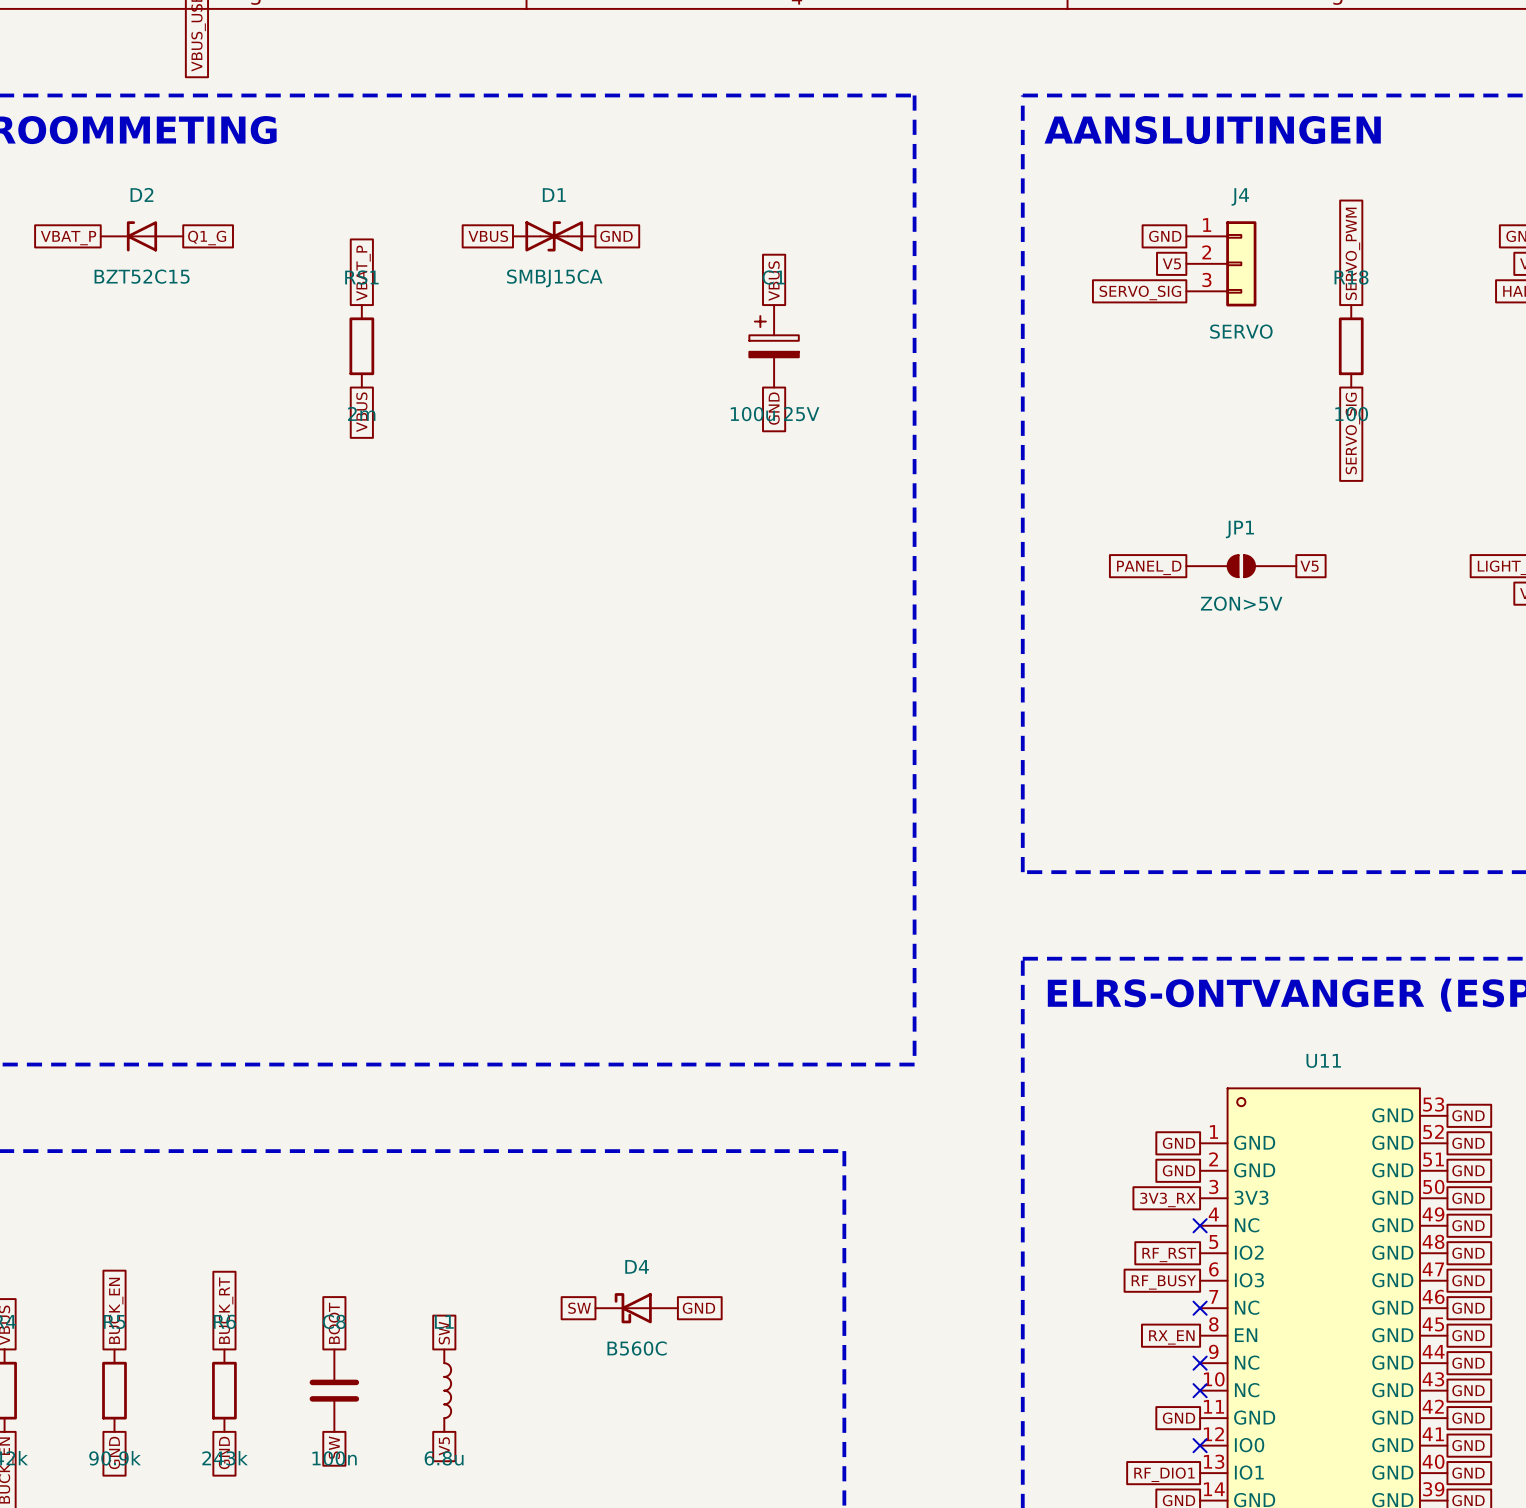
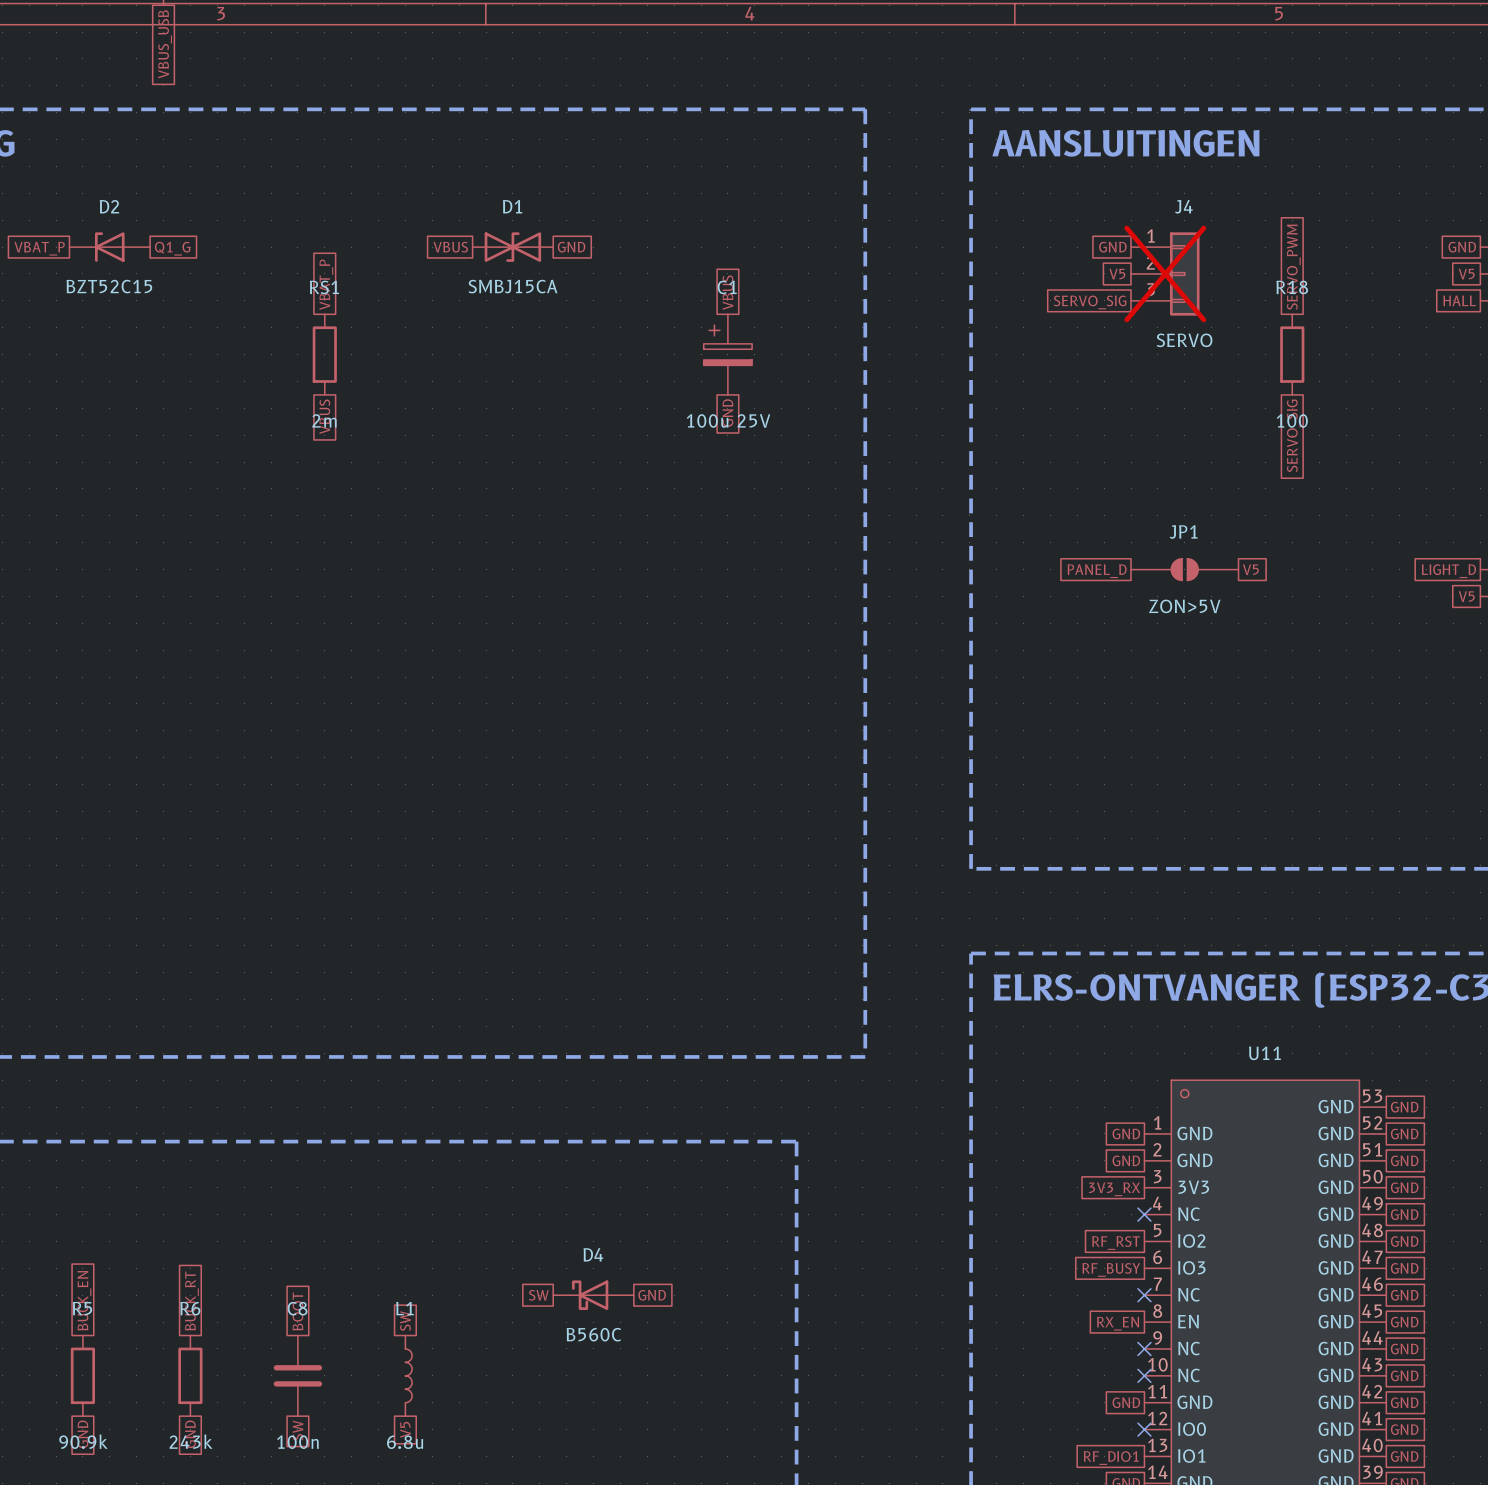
J4 do-not-place cross: none -> (1165, 273)

